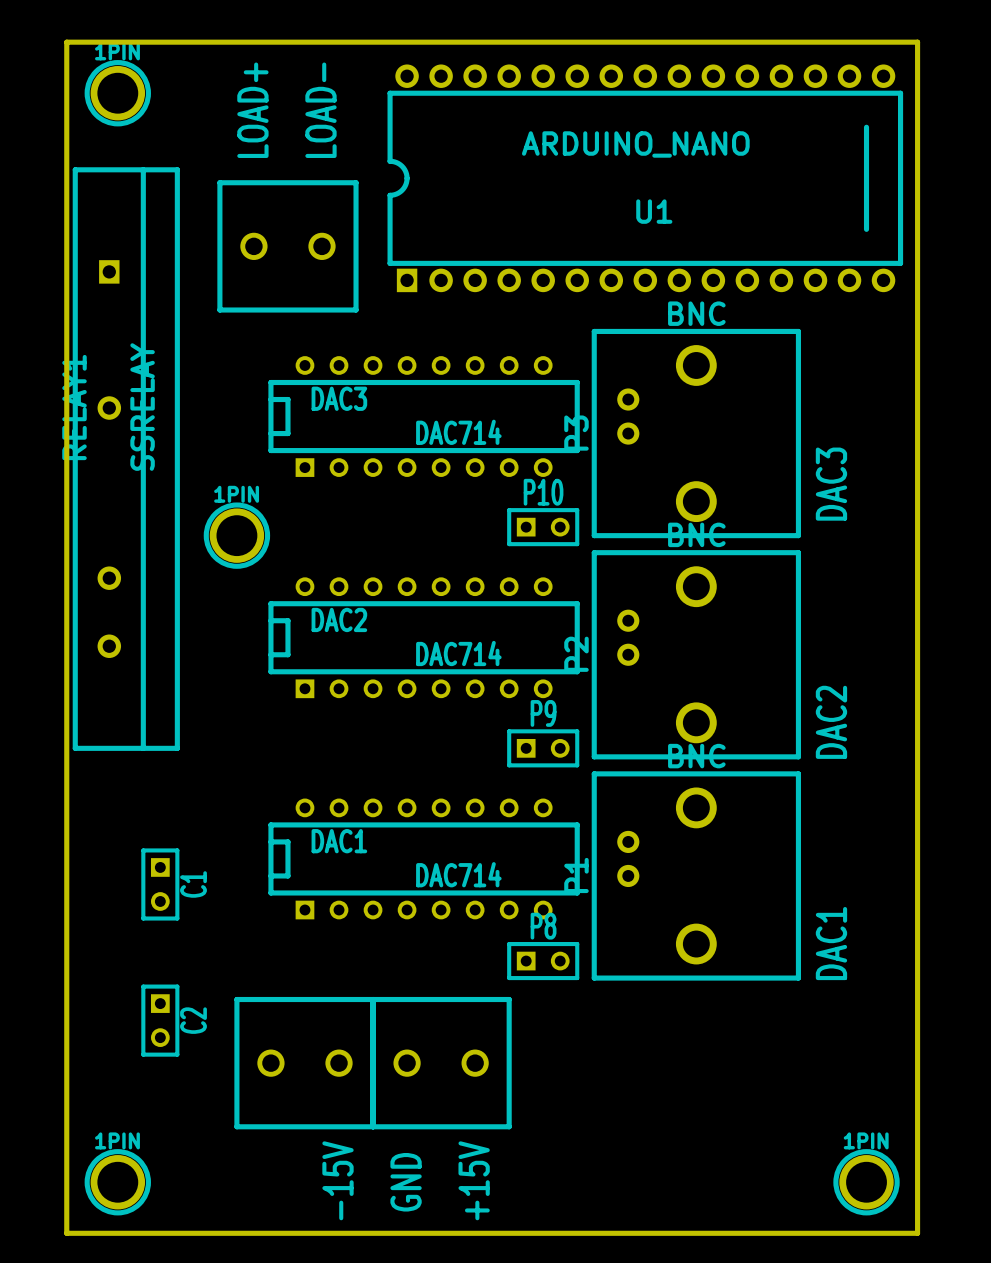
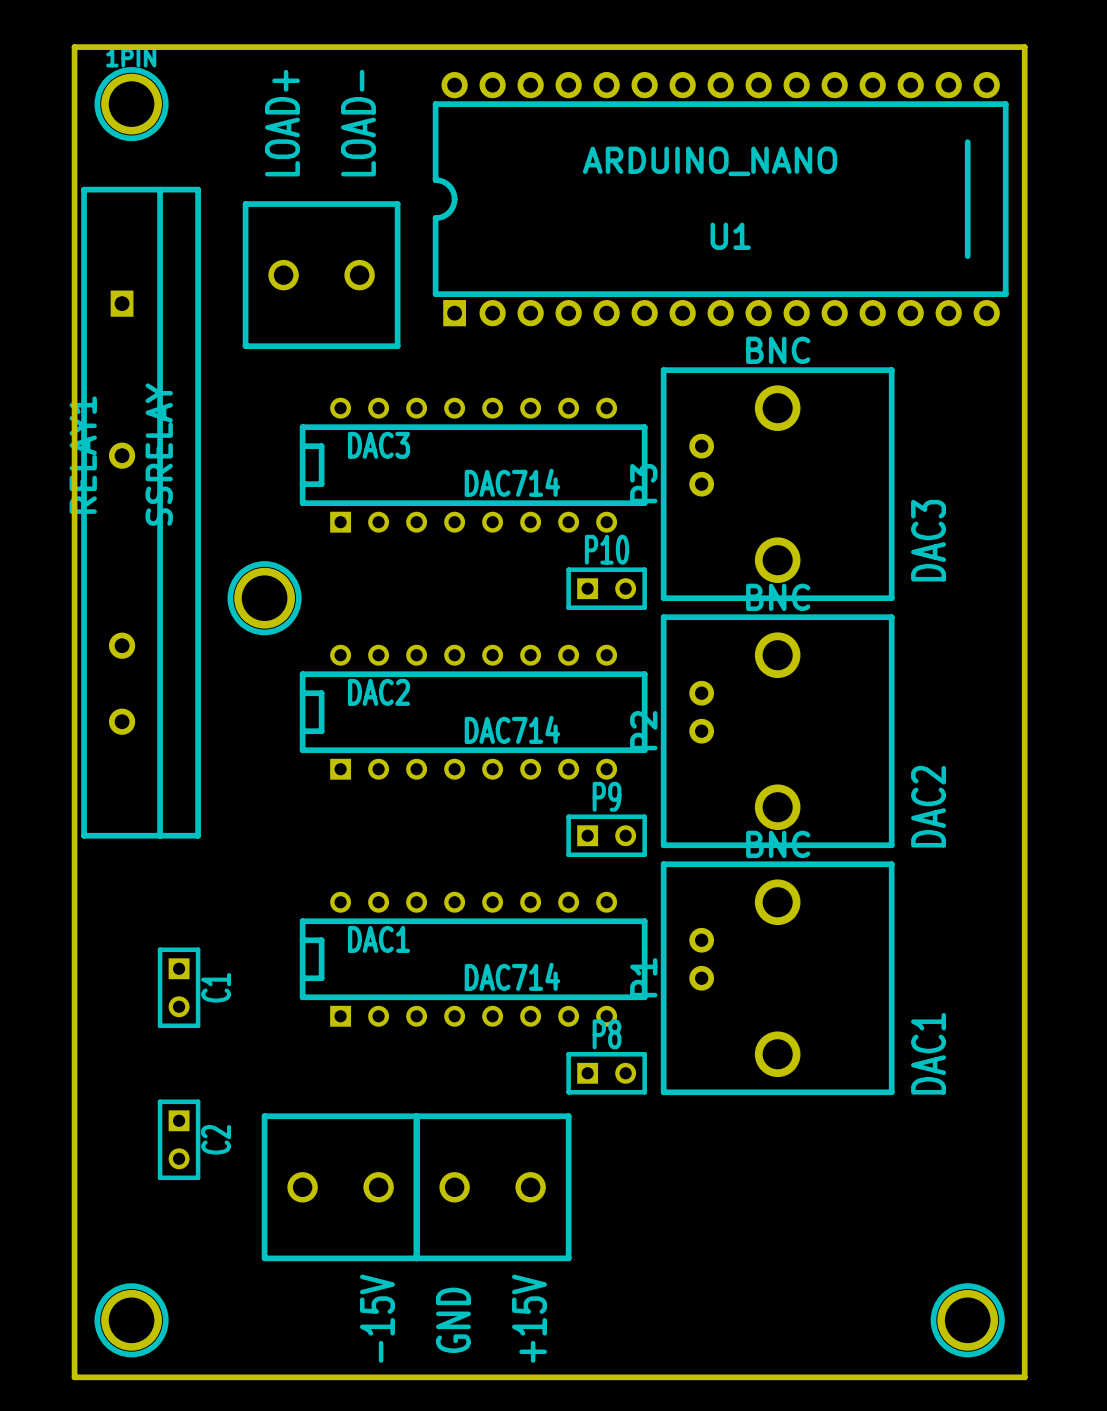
1PIN name: 1PIN (236, 494) -> none
1PIN name: 1PIN (117, 1140) -> none
1PIN name: 1PIN (866, 1140) -> none

